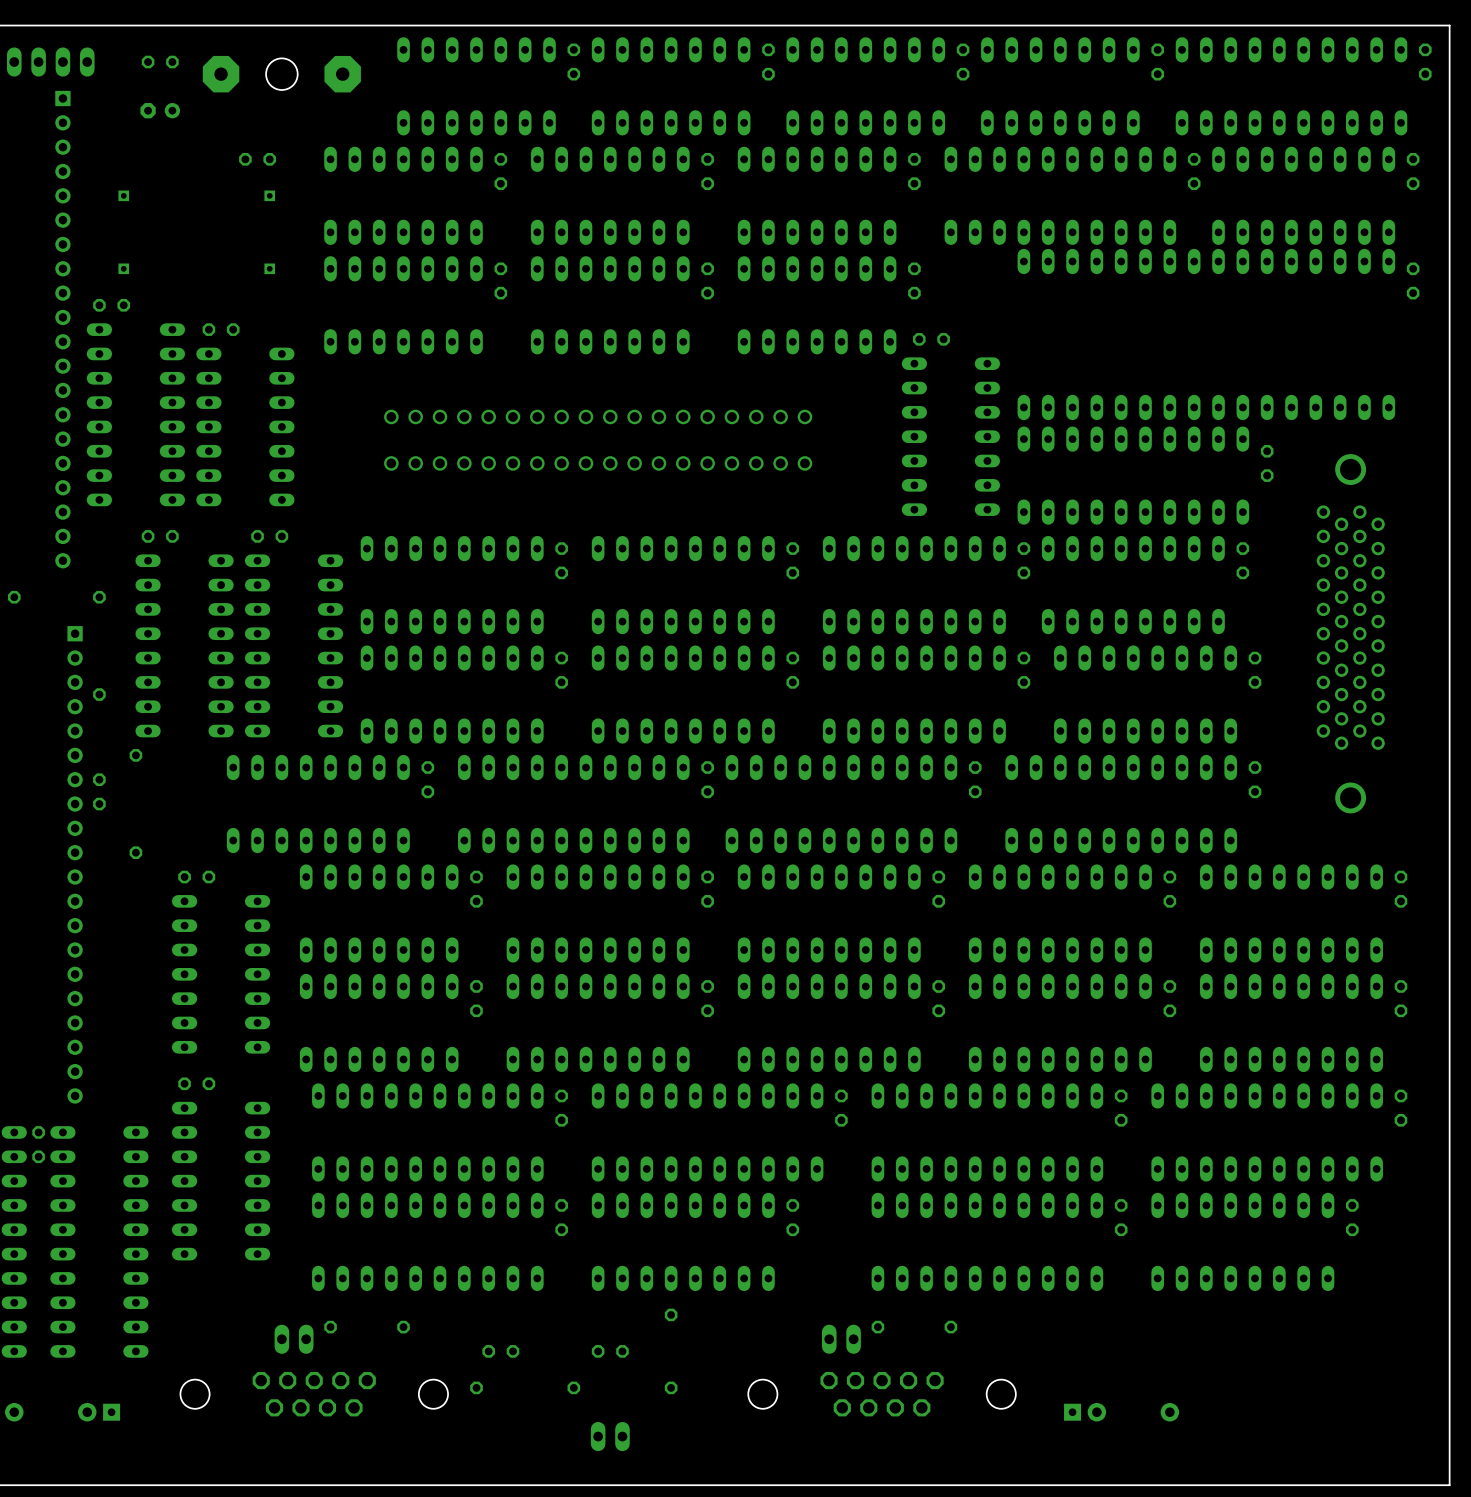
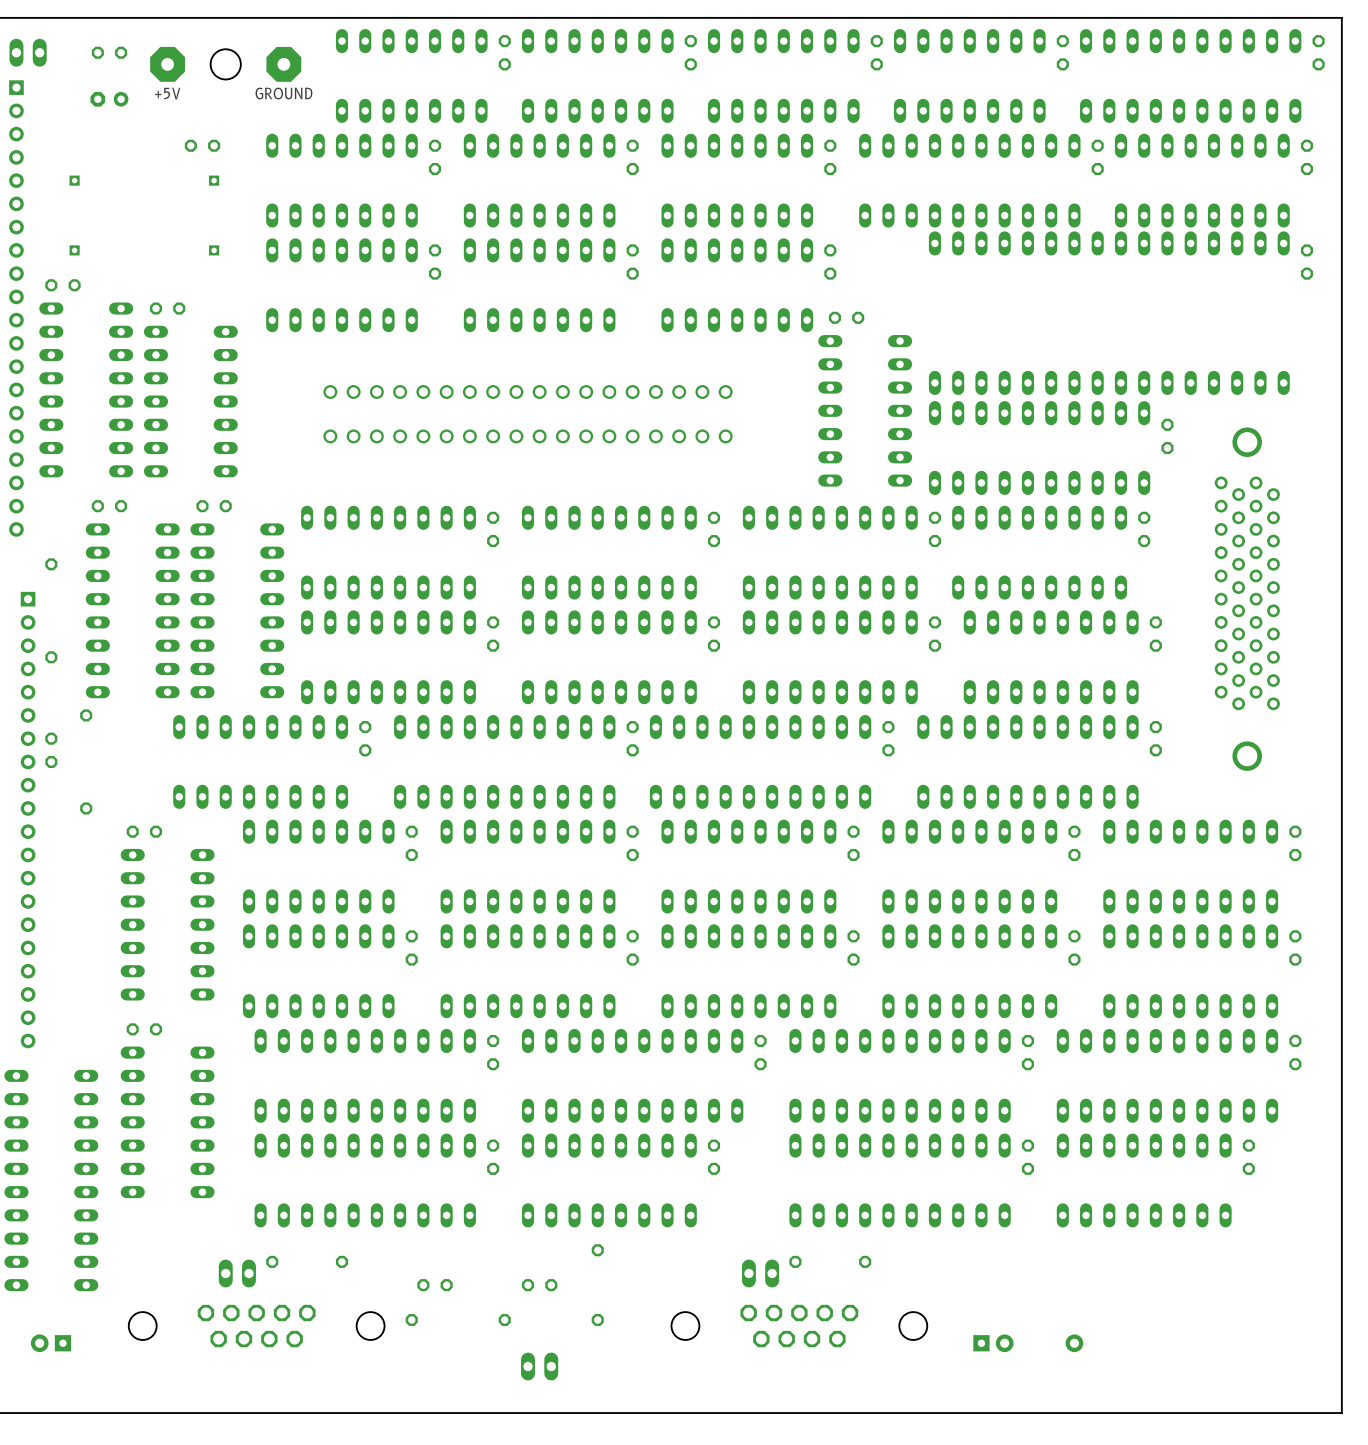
text: none -> +5V (167, 93)
text: none -> GROUND (283, 93)

